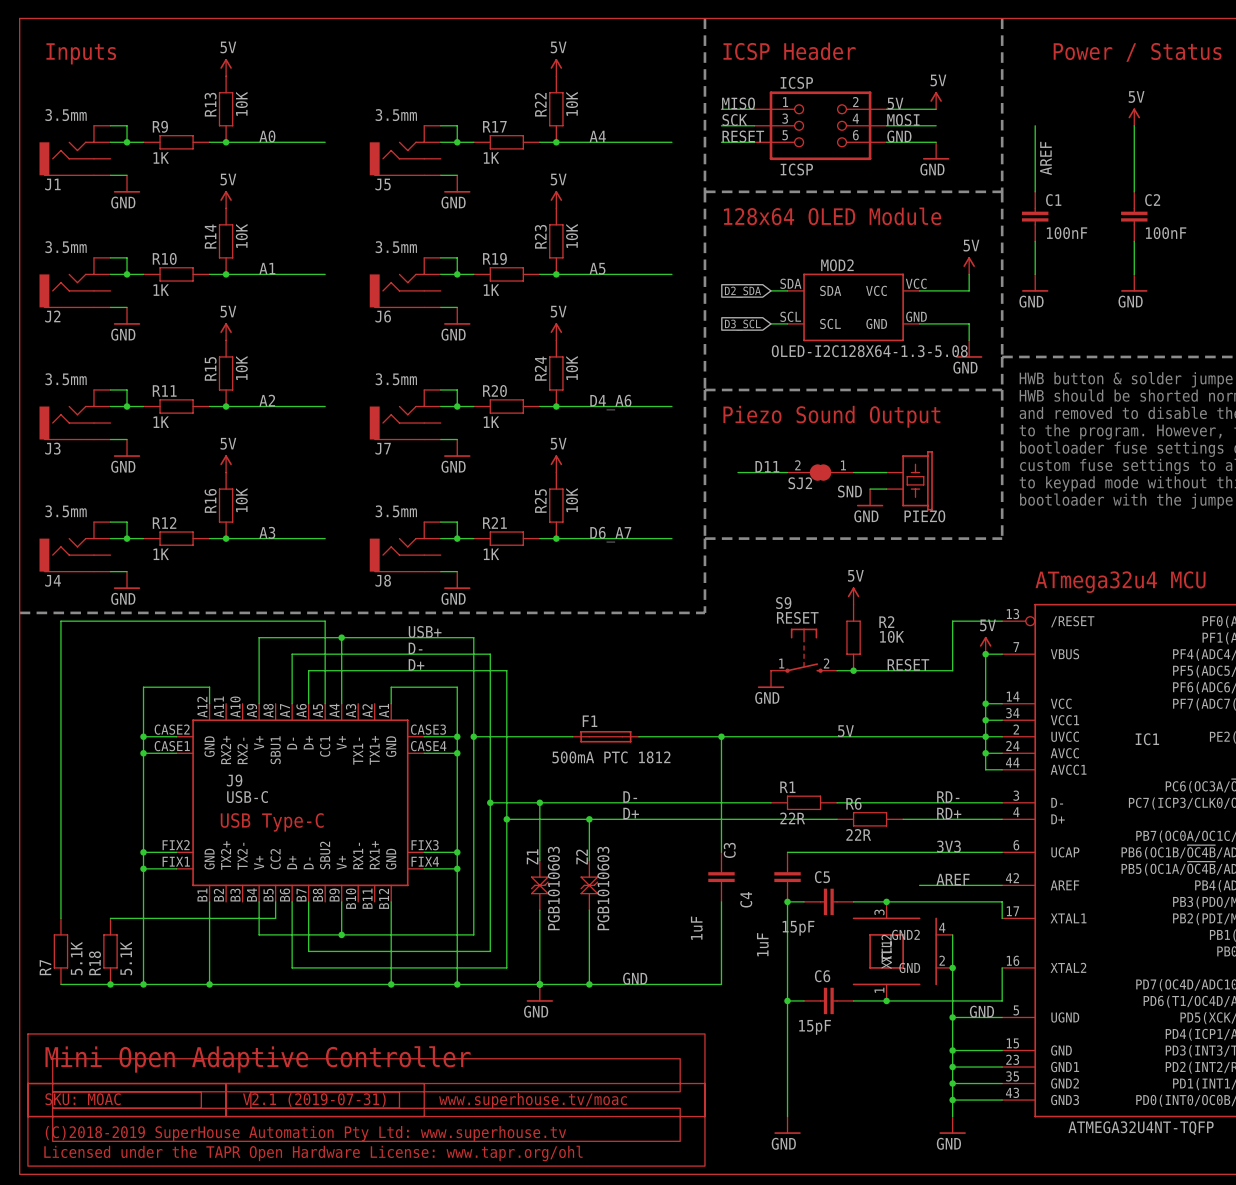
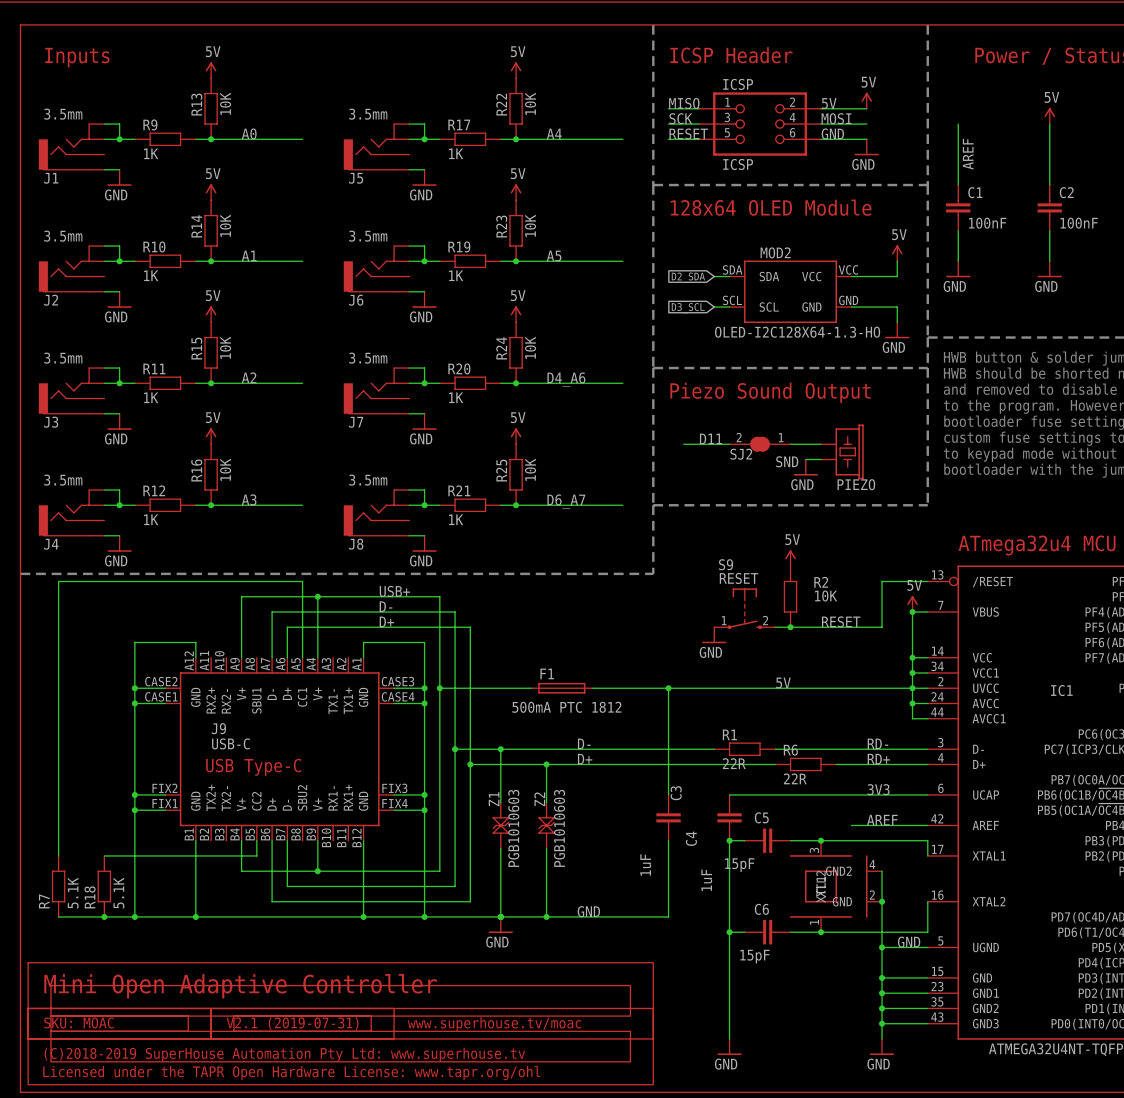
MOD2 value: OLED-I2C128X64-1.3-5.08 (869, 351) -> OLED-I2C128X64-1.3-HO (797, 332)

